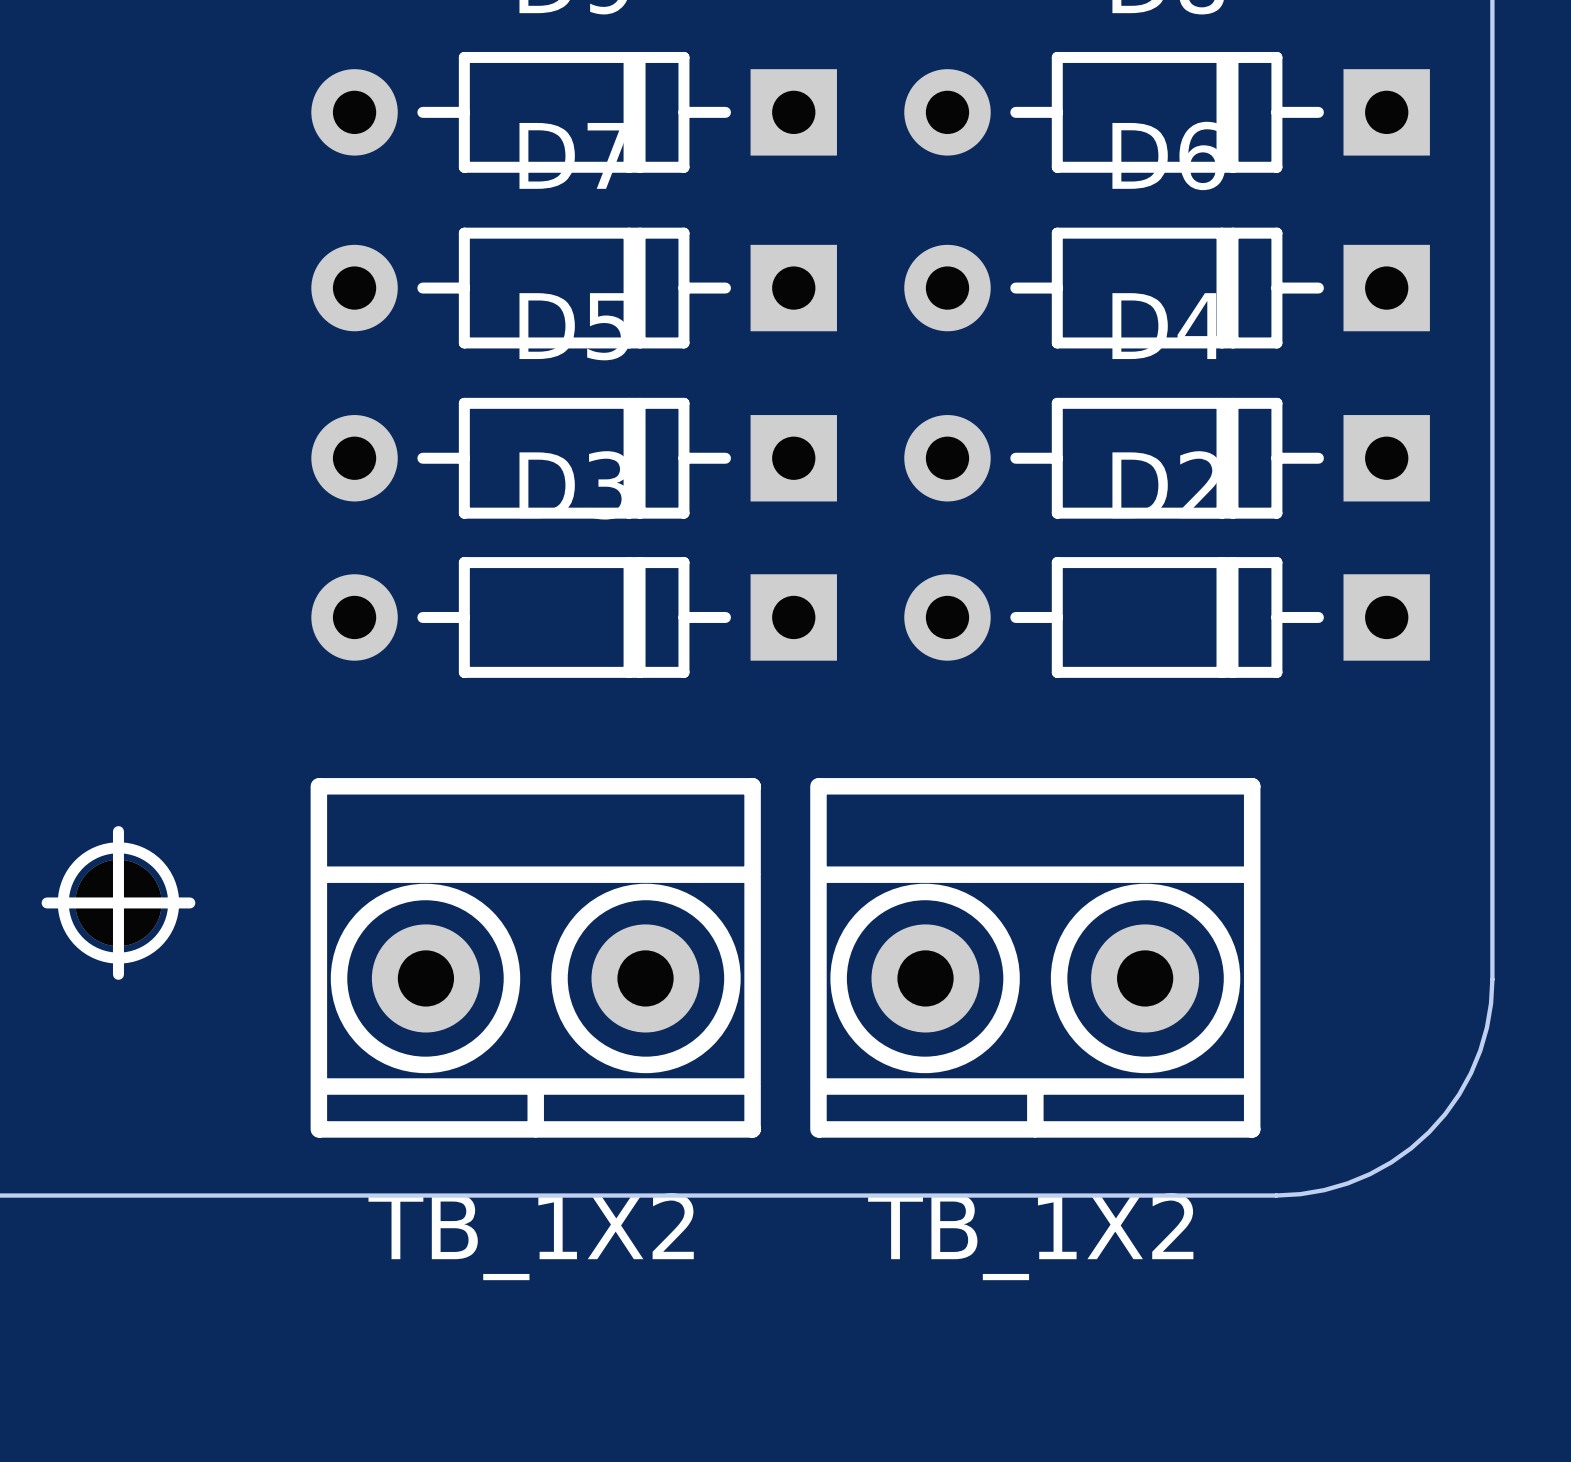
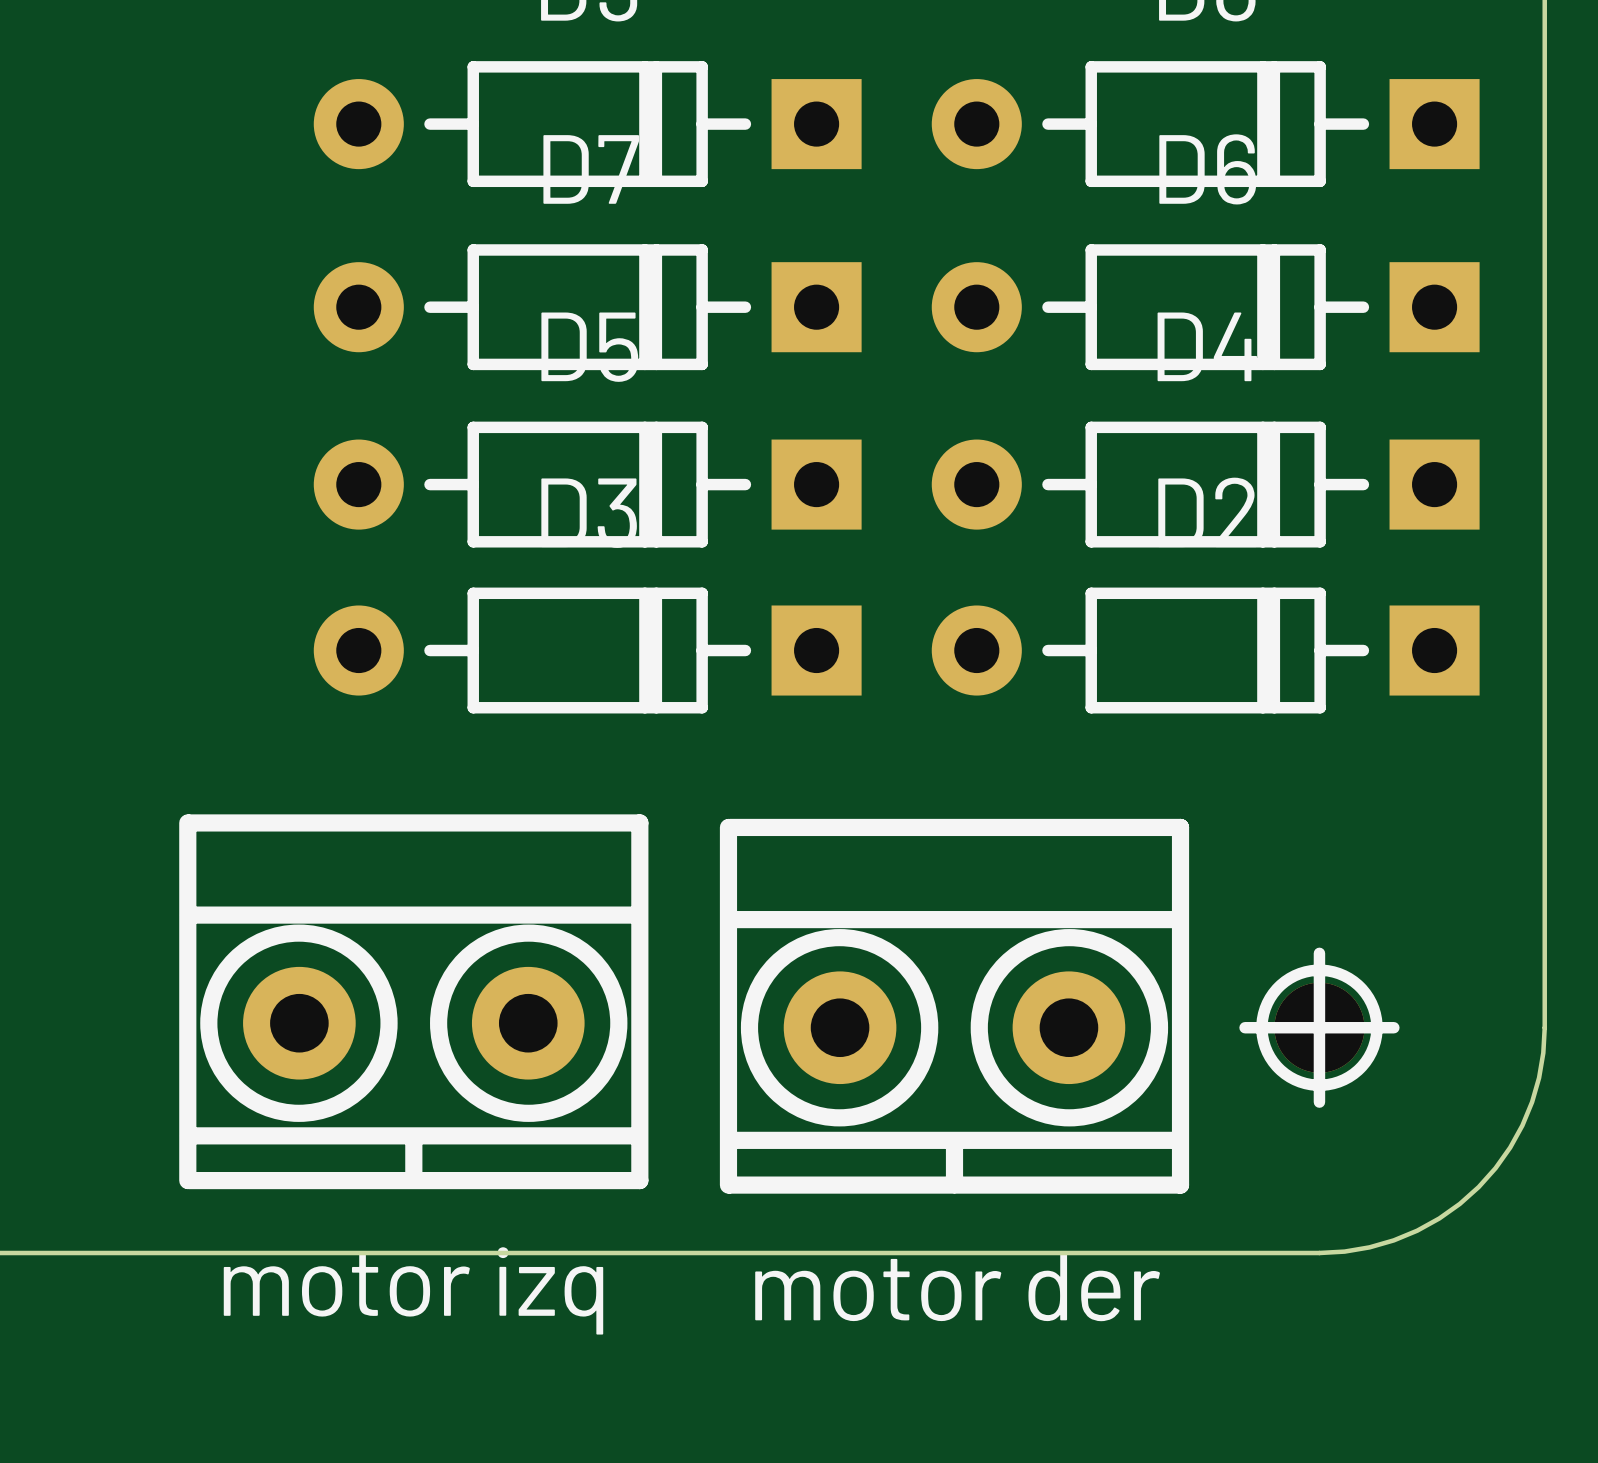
part: (118, 902) -> none
part: none -> motor izq (413, 1001)
part: TB_1X2 (535, 957) -> none
part: TB_1X2 (1035, 957) -> none
part: none -> motor der (954, 1006)
part: none -> (1319, 1027)

